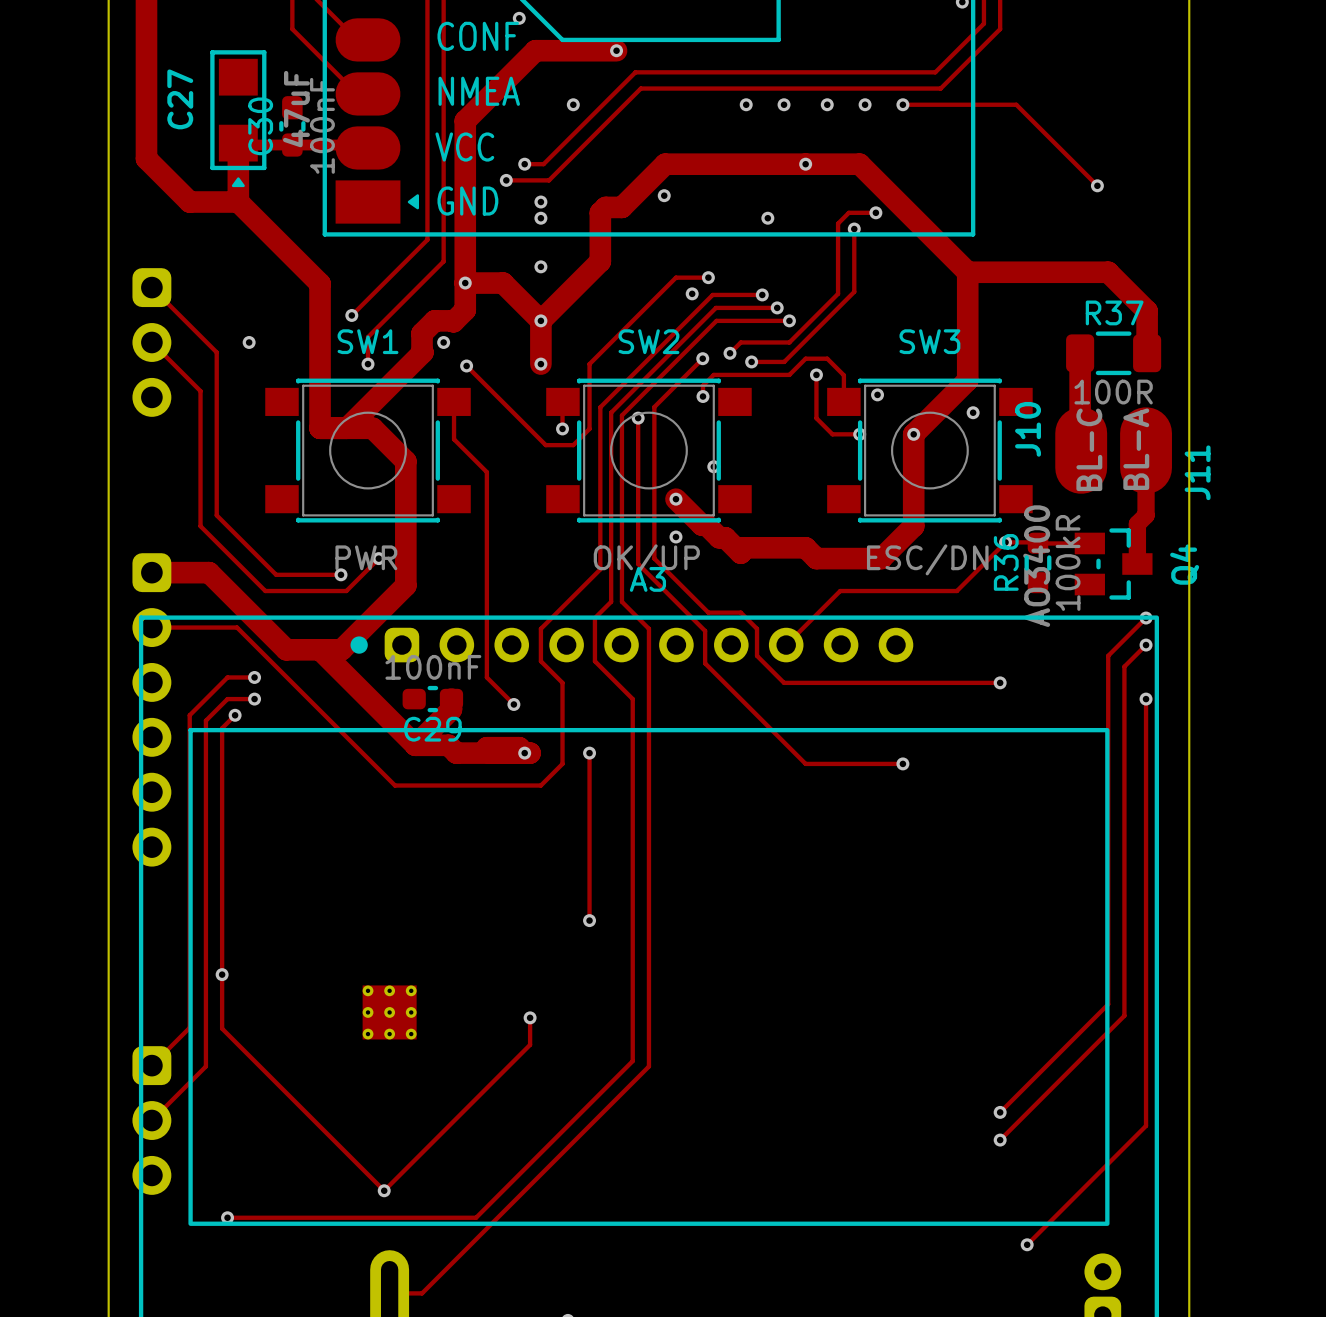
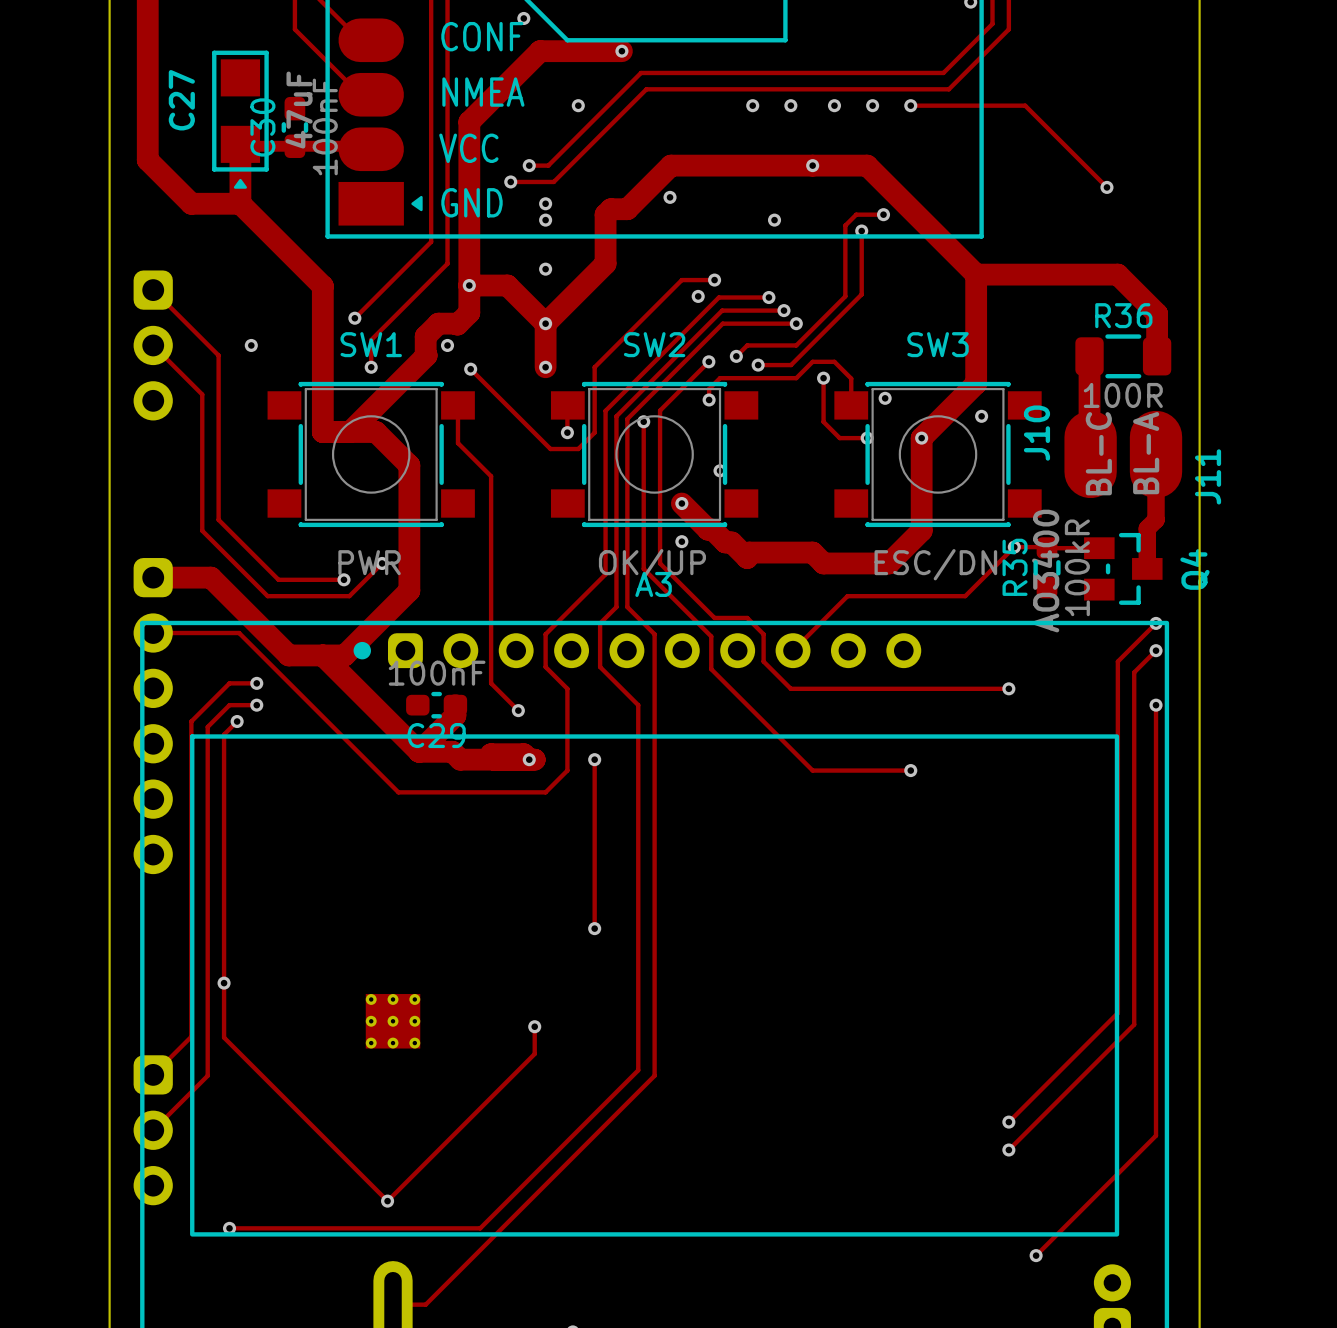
R37 name: R37 (1114, 312) -> R36 (1123, 315)
R36 name: R36 (1006, 562) -> R35 (1015, 567)

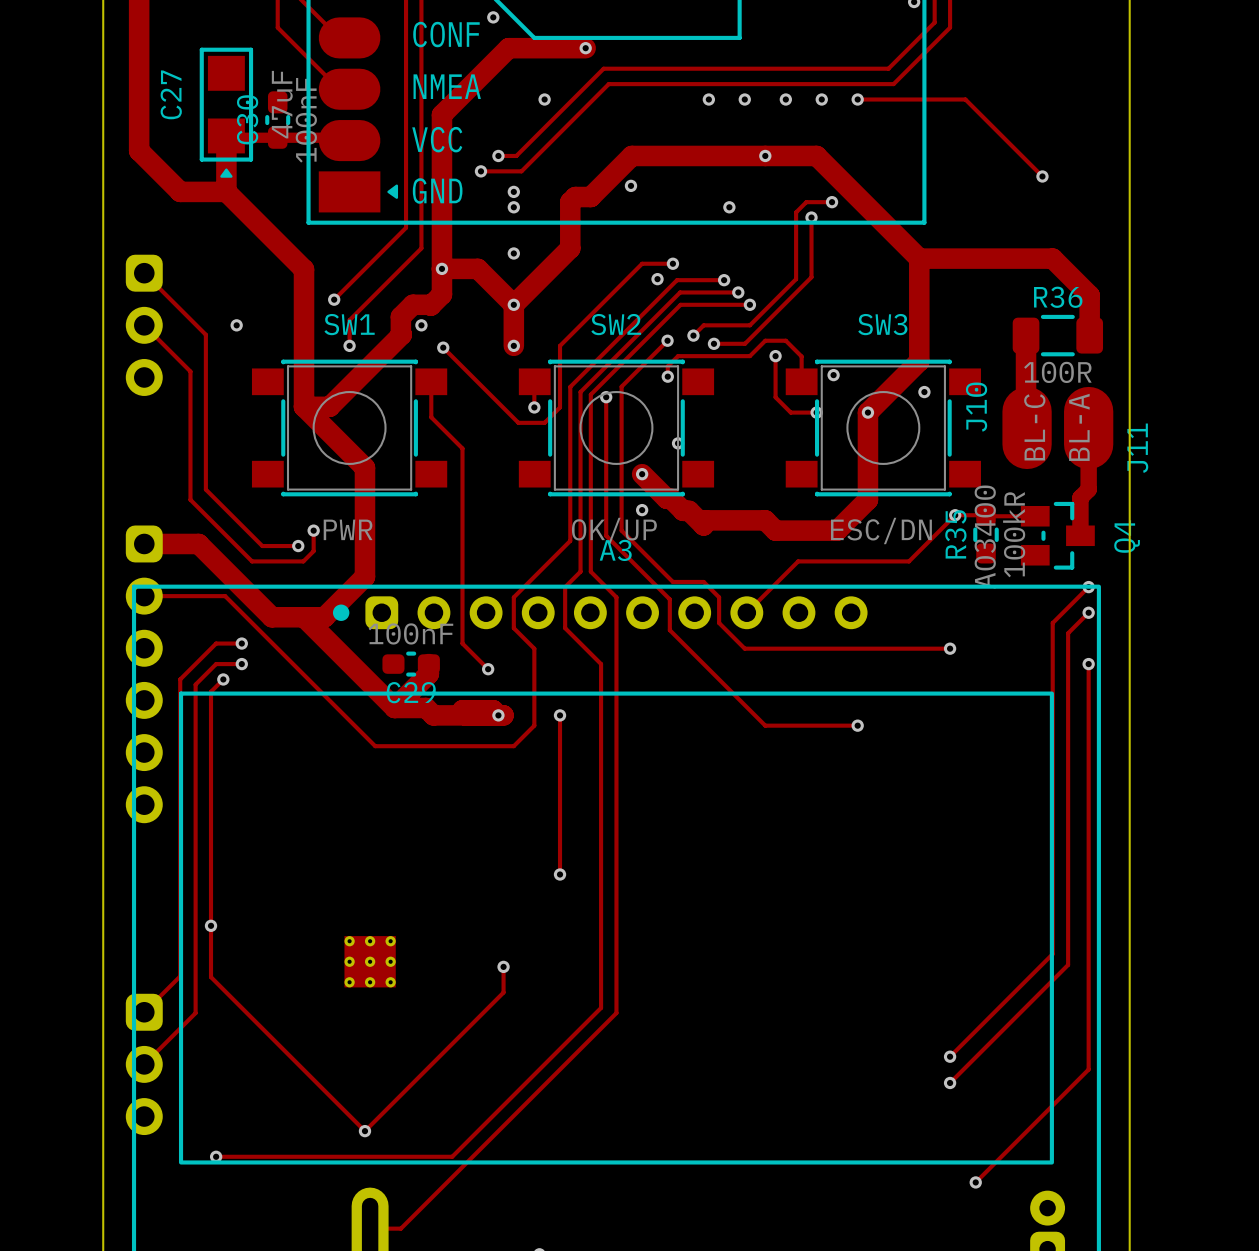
track: (350, 432) (376, 432) (409, 465) (409, 590) (387, 612) -> (304, 406) (364, 467) (364, 576)
via: none -> (313, 530)
track: (382, 563) (349, 596) (322, 596) -> (313, 530) (313, 551) (303, 561)
via: (382, 563) -> none
track: (316, 579) (343, 579) -> none
via: none -> (298, 546)
via: (343, 579) -> none

